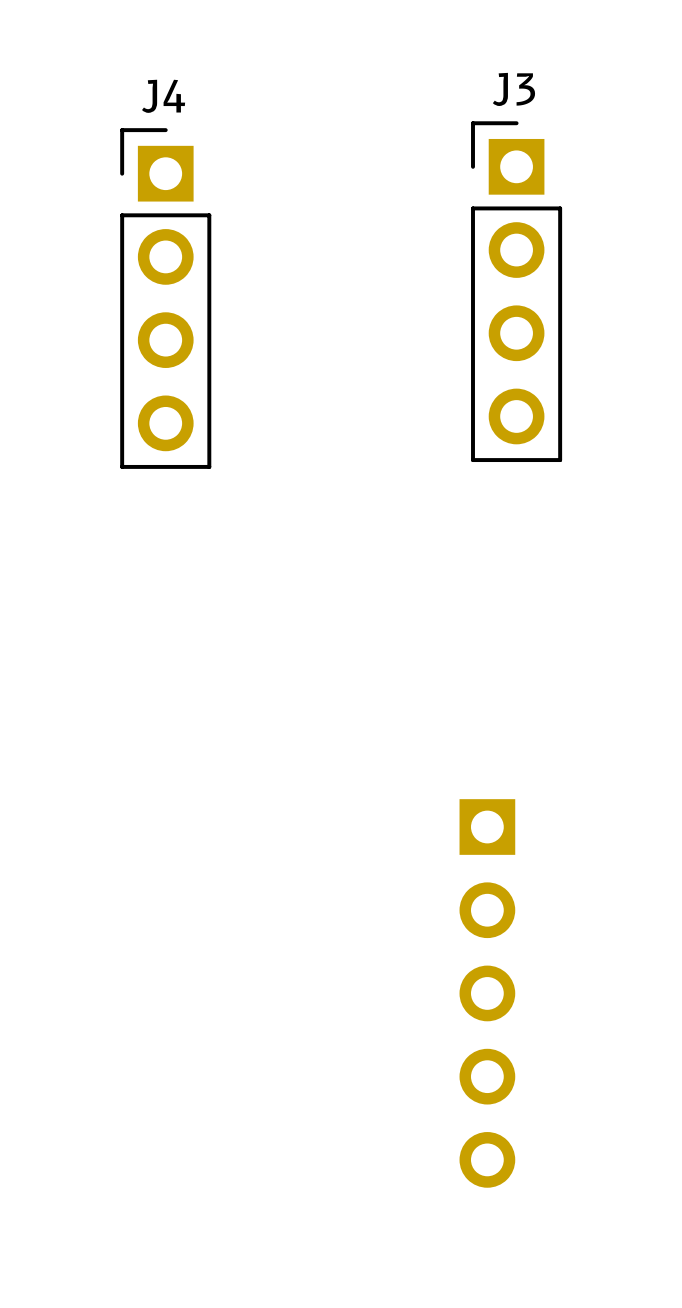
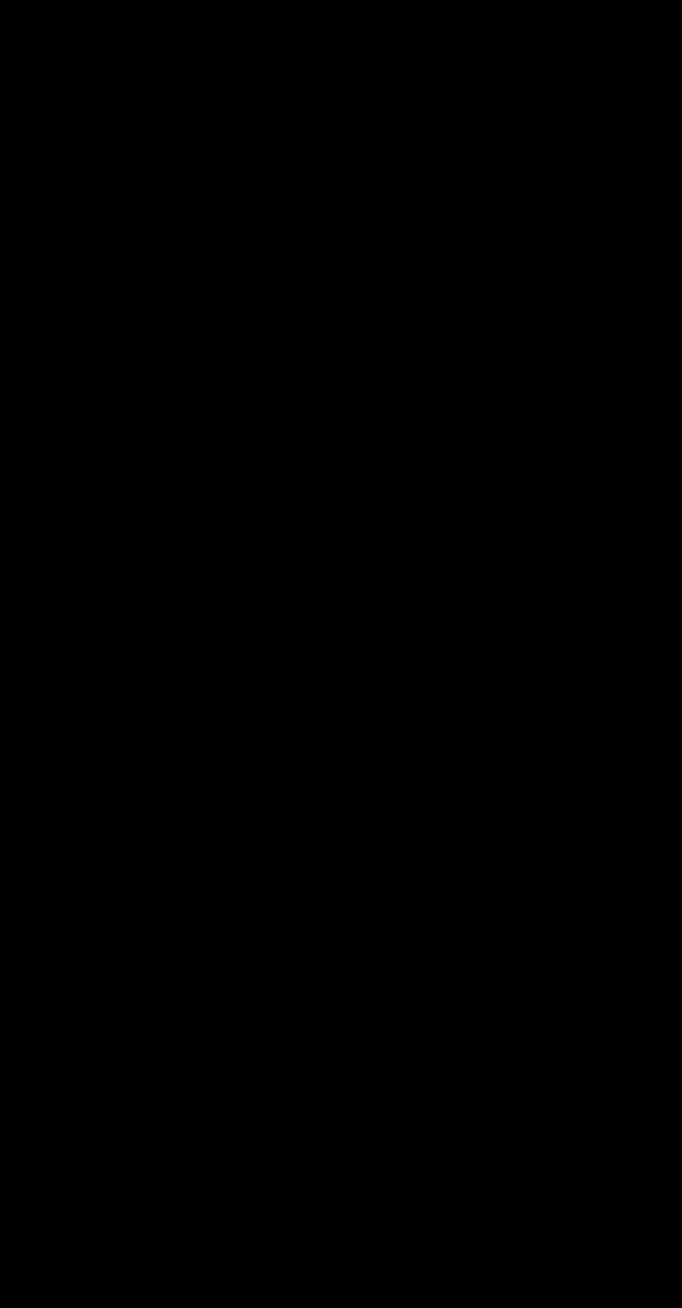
J3: (516, 291) -> none
J4: (165, 298) -> none
part: (487, 993) -> none

